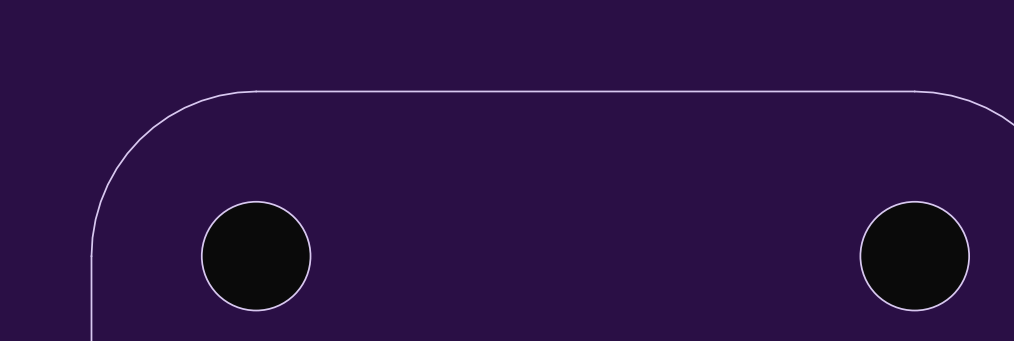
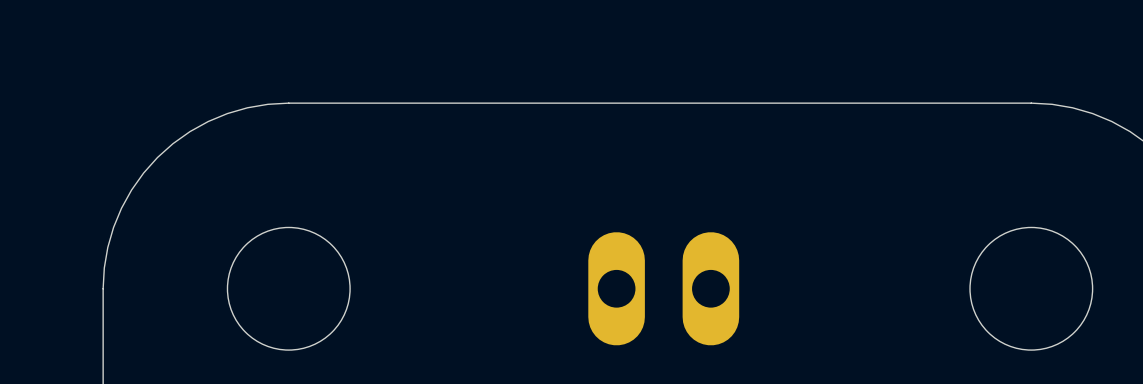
part: none -> (663, 288)

